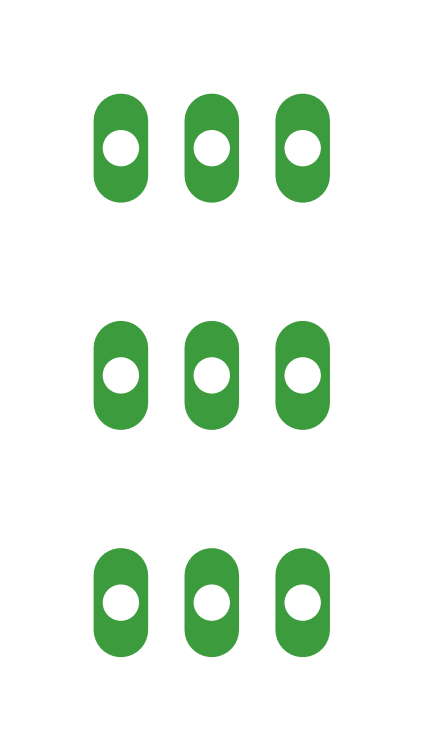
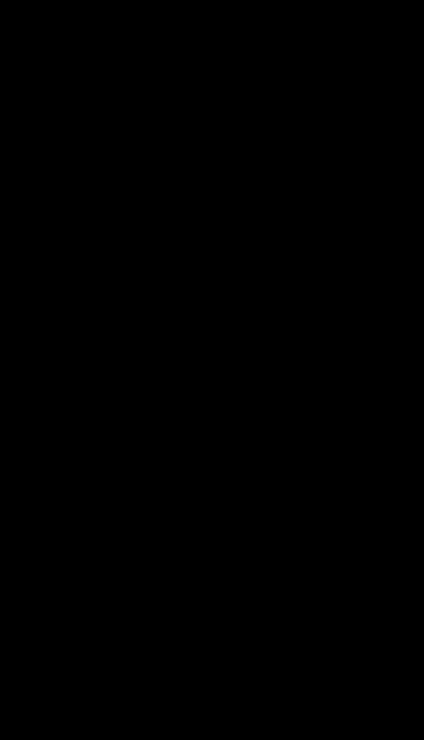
part: (211, 148) -> none
part: (211, 375) -> none
part: (211, 602) -> none

